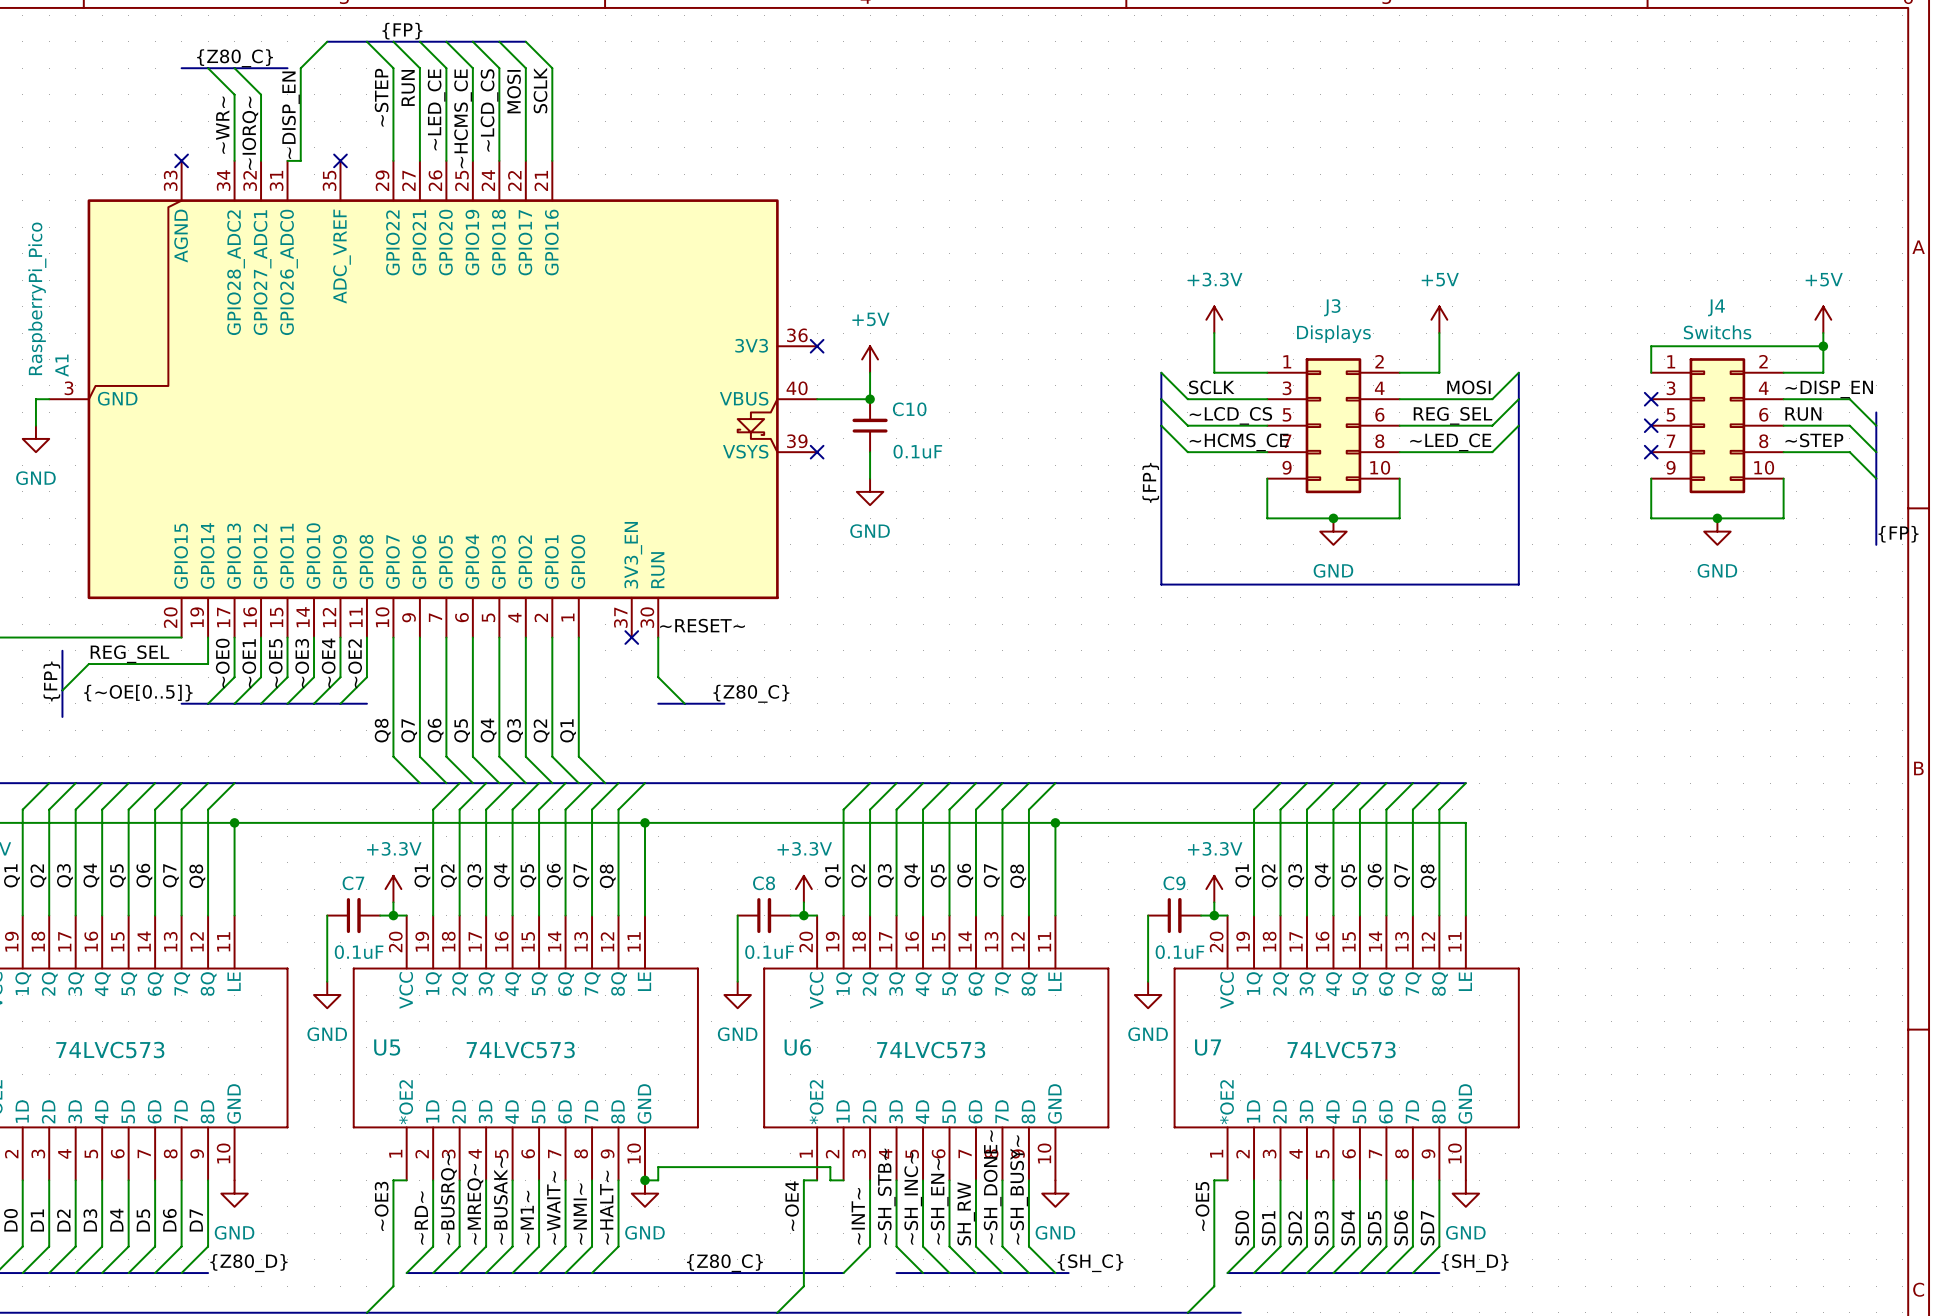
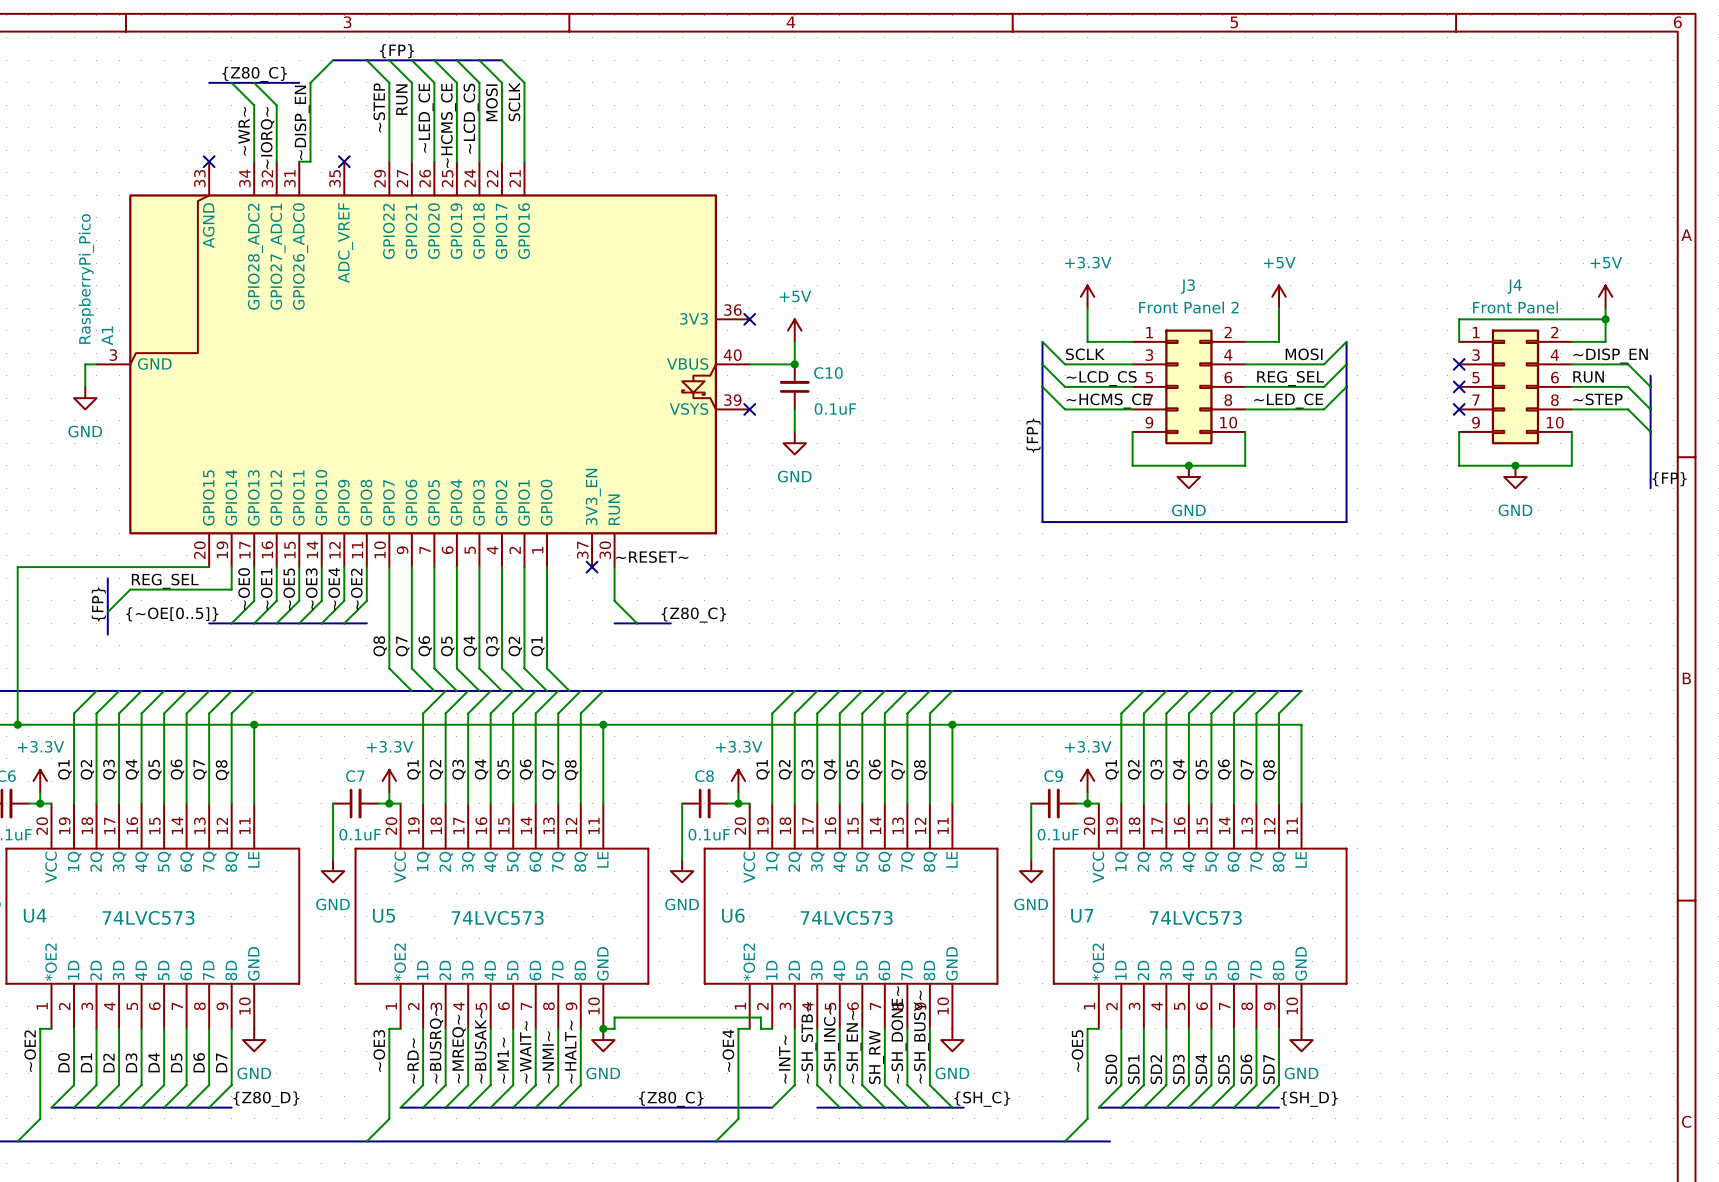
J4 value: Switchs (1717, 332) -> Front Panel (1515, 307)
J3 value: Displays (1333, 334) -> Front Panel 2 (1188, 307)

